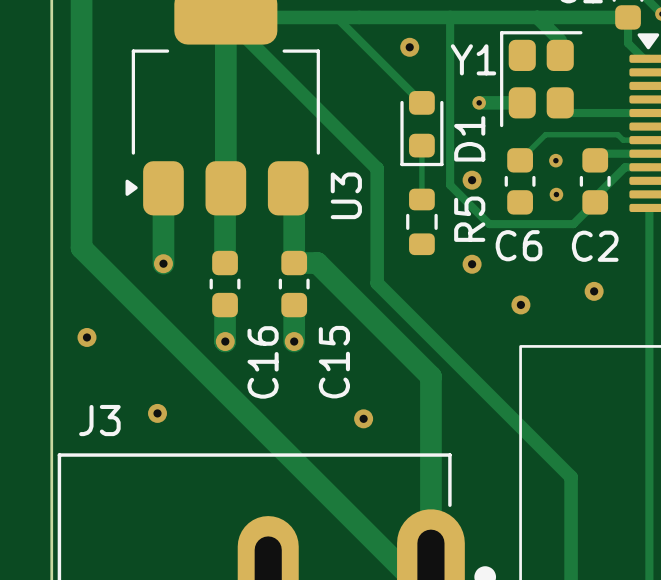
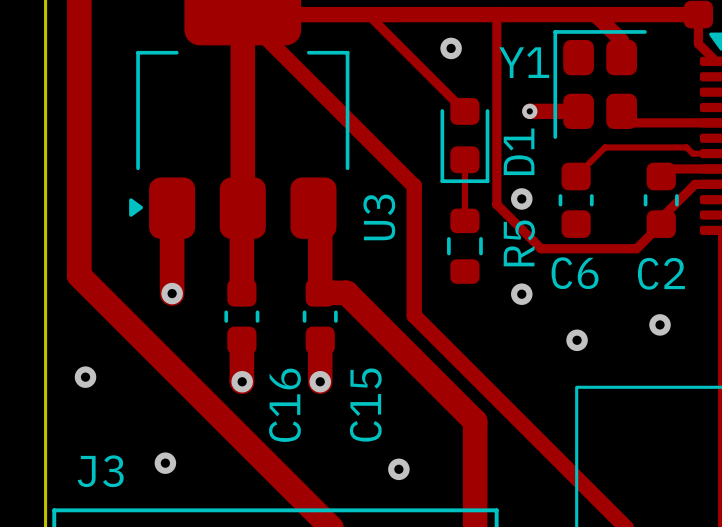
via: (555, 160) -> none
via: (556, 194) -> none

